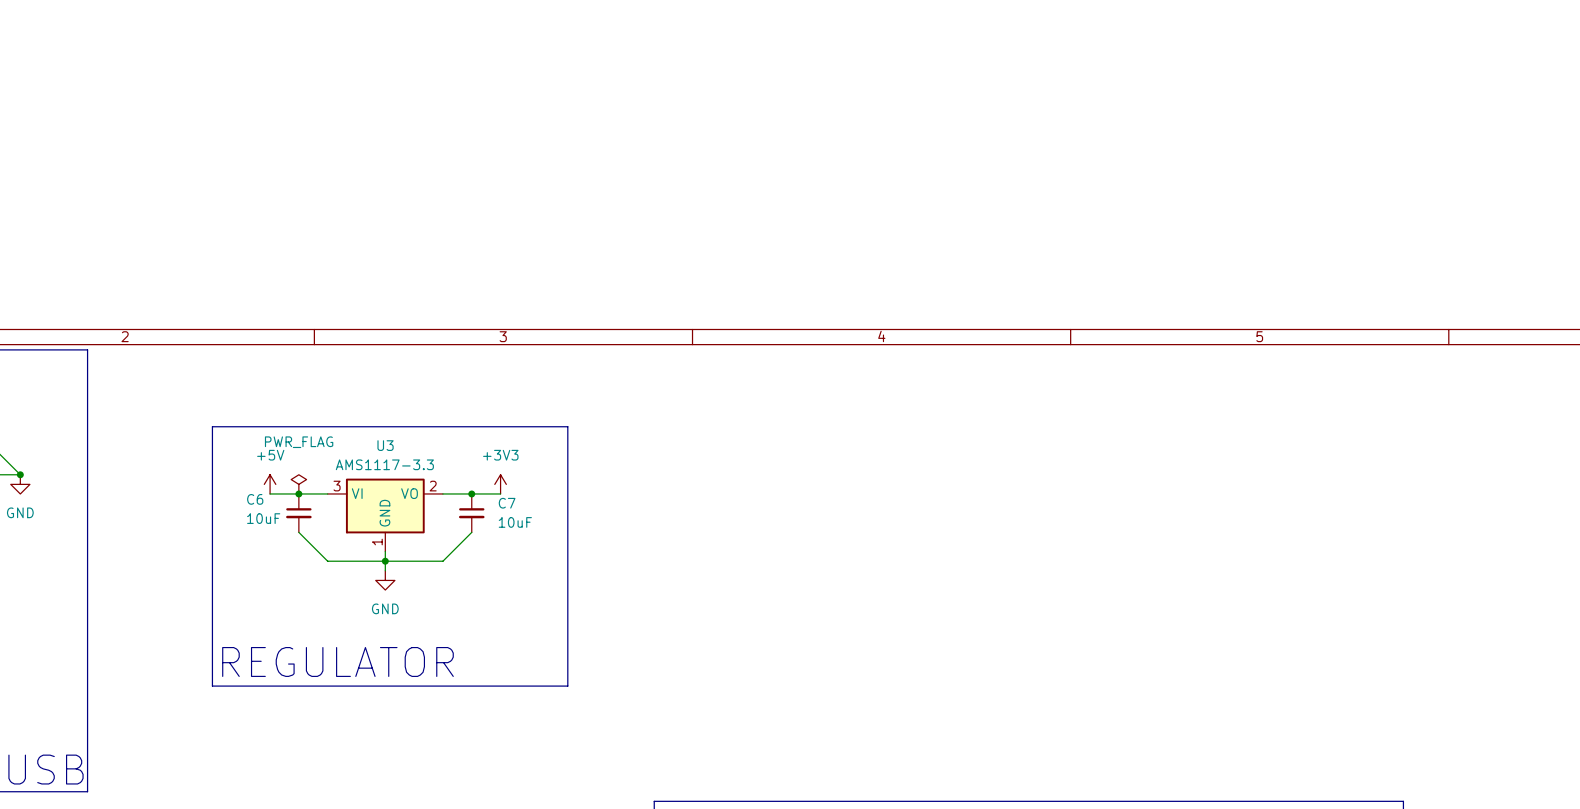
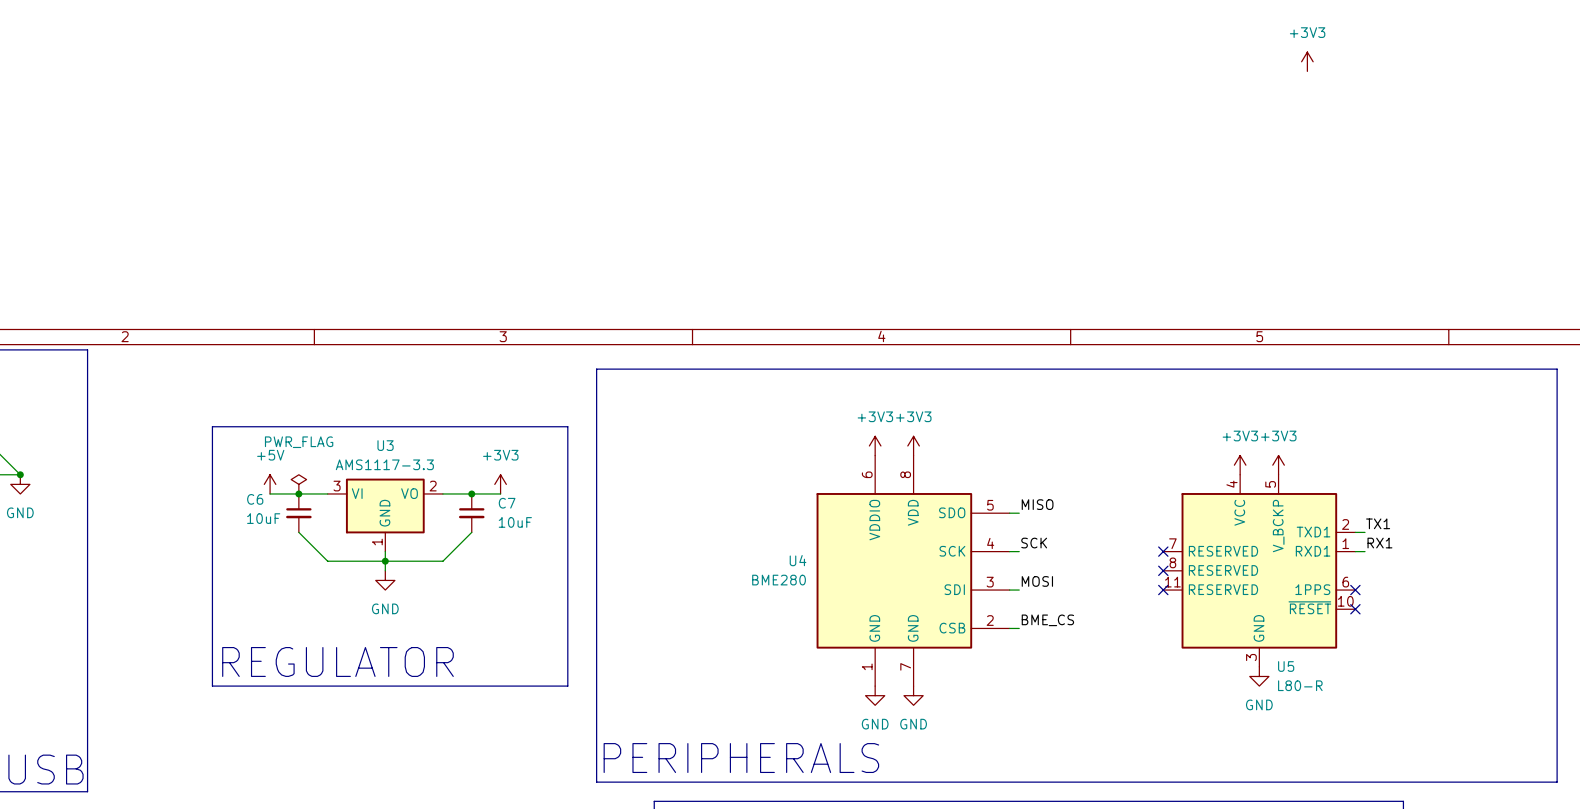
power symbol: none -> +3V3 (1307, 61)
line: none -> (596, 369) (1557, 369) (1557, 782) (596, 782) (596, 369)
power symbol: none -> +3V3 (875, 445)
power symbol: none -> +3V3 (913, 445)
power symbol: none -> +3V3 (1240, 465)
power symbol: none -> +3V3 (1278, 465)
label: none -> MISO (1037, 504)
wire: none -> (1009, 513) (1019, 513)
label: none -> TX1 (1378, 523)
wire: none -> (1355, 532) (1365, 532)
label: none -> SCK (1034, 543)
label: none -> RX1 (1379, 543)
wire: none -> (1009, 551) (1019, 551)
no-connect mark: none -> (1163, 551)
wire: none -> (1355, 551) (1365, 551)
U4: none -> BME280 (913, 570)
no-connect mark: none -> (1163, 570)
U5: none -> L80-R (1259, 570)
label: none -> MOSI (1037, 581)
wire: none -> (1009, 590) (1019, 590)
no-connect mark: none -> (1163, 590)
no-connect mark: none -> (1355, 590)
no-connect mark: none -> (1355, 609)
label: none -> BME_CS (1047, 620)
wire: none -> (1009, 628) (1019, 628)
power symbol: none -> GND (1259, 676)
power symbol: none -> GND (875, 695)
power symbol: none -> GND (913, 695)
text: none -> PERIPHERALS (741, 758)

